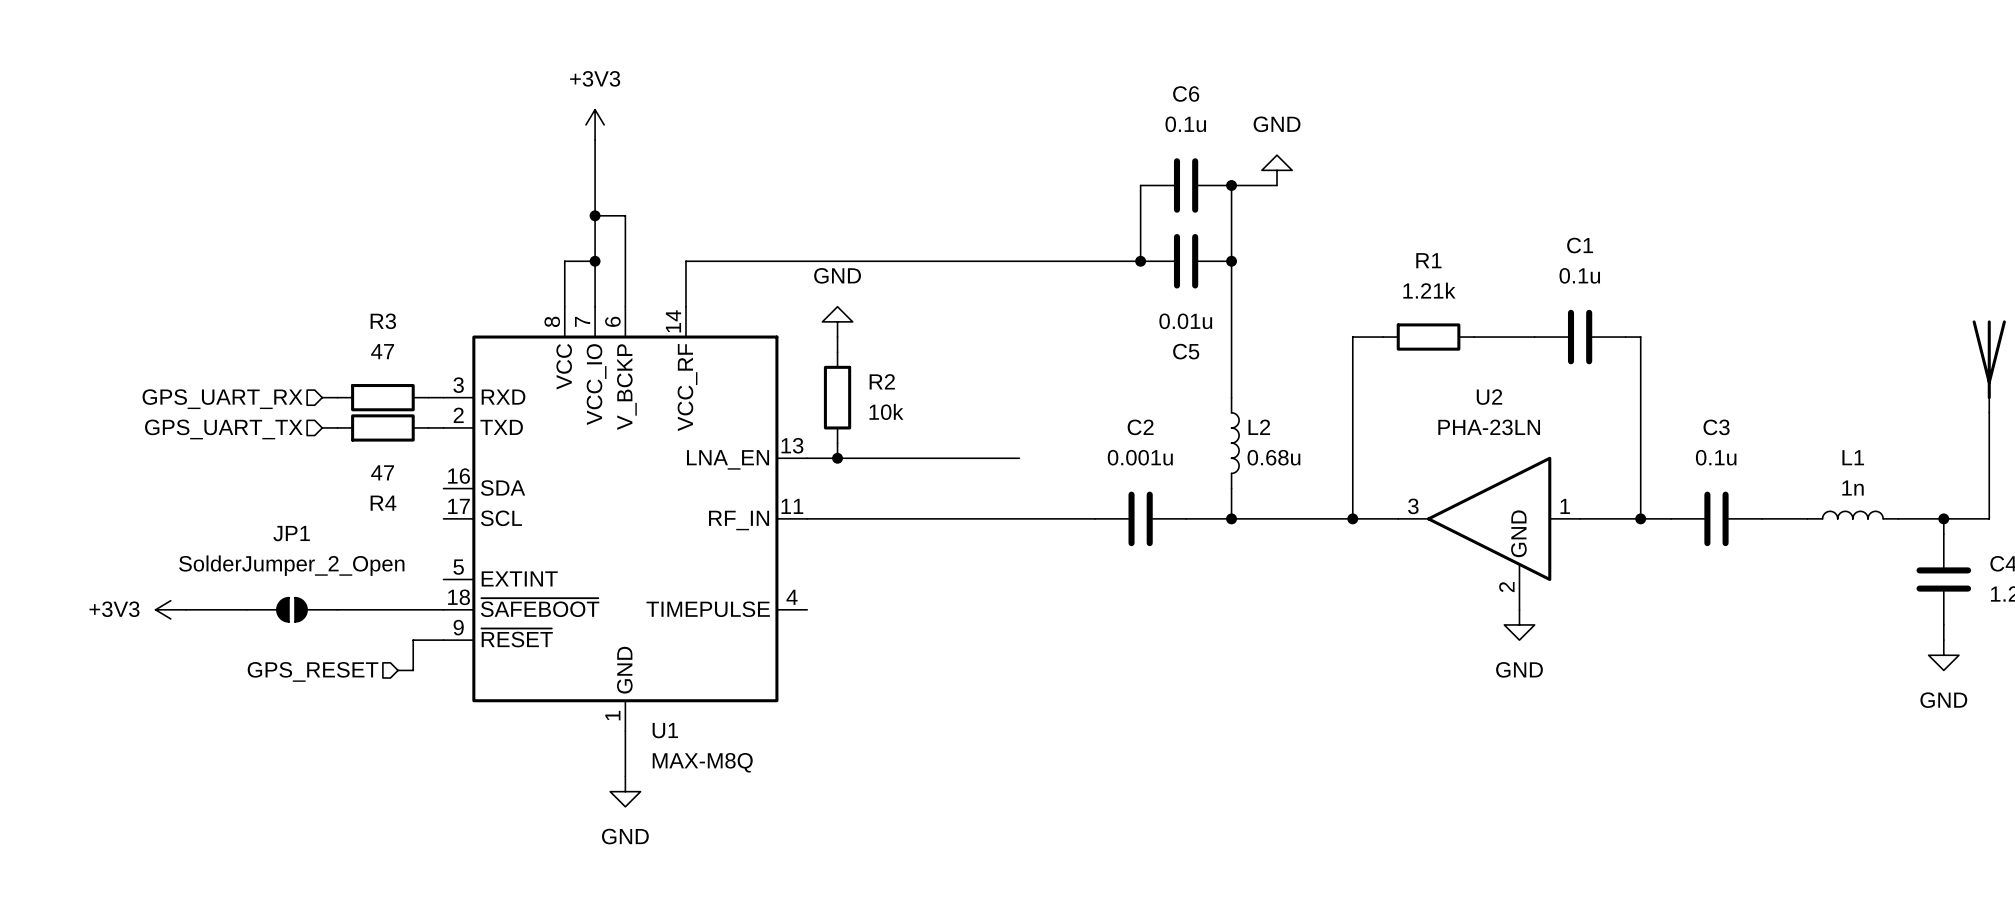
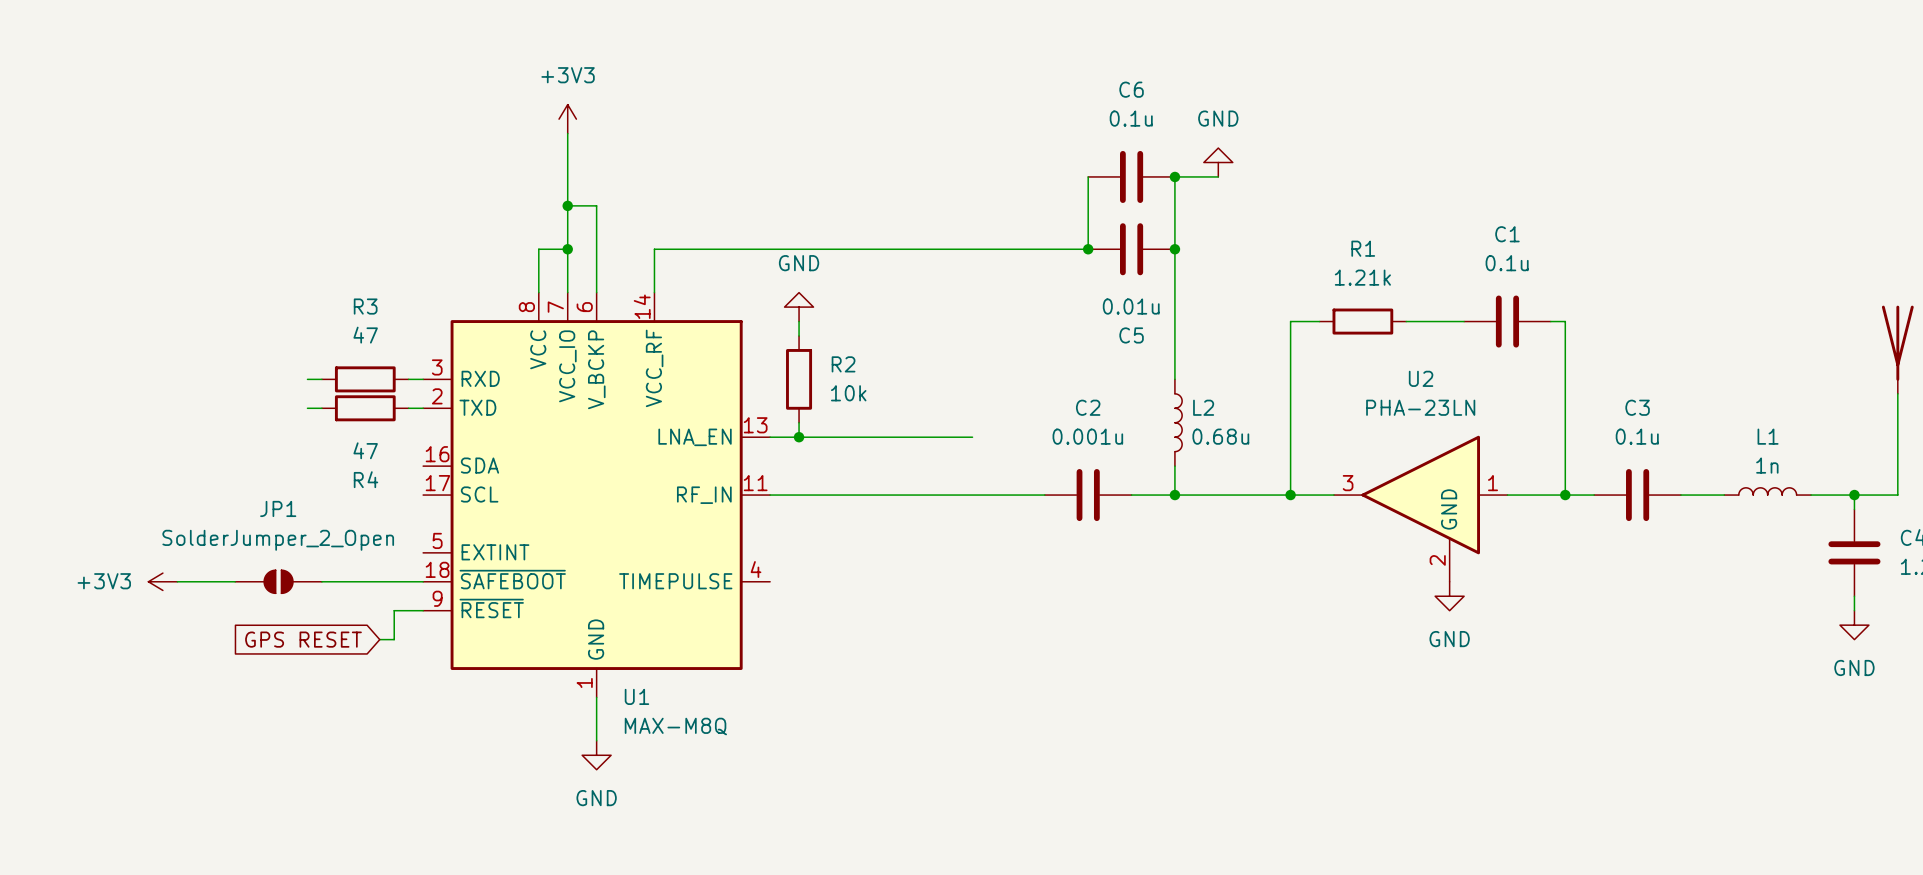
hierarchical label: GPS_UART_RX (222, 399) -> none
hierarchical label: GPS_UART_TX (223, 429) -> none
global label: none -> GPS RESET (303, 639)
hierarchical label: GPS_RESET (313, 671) -> none

